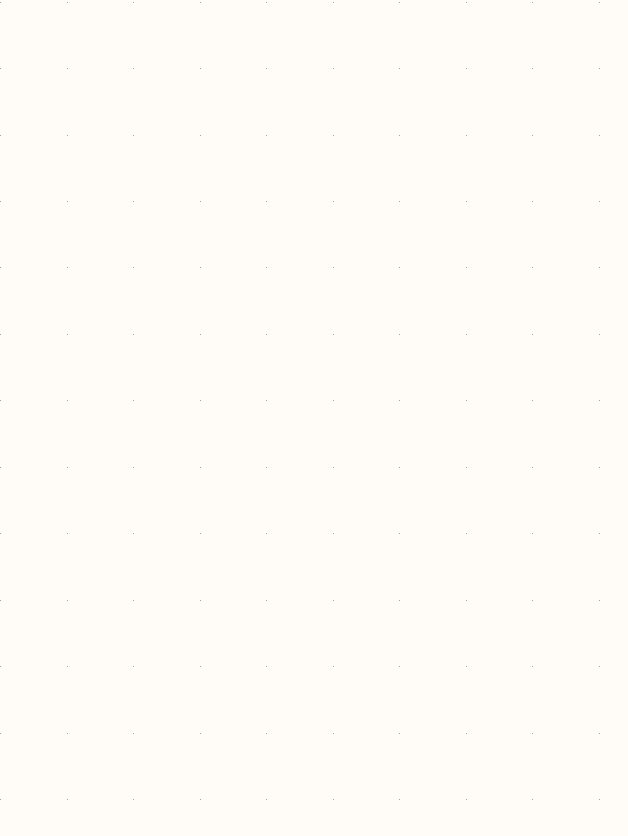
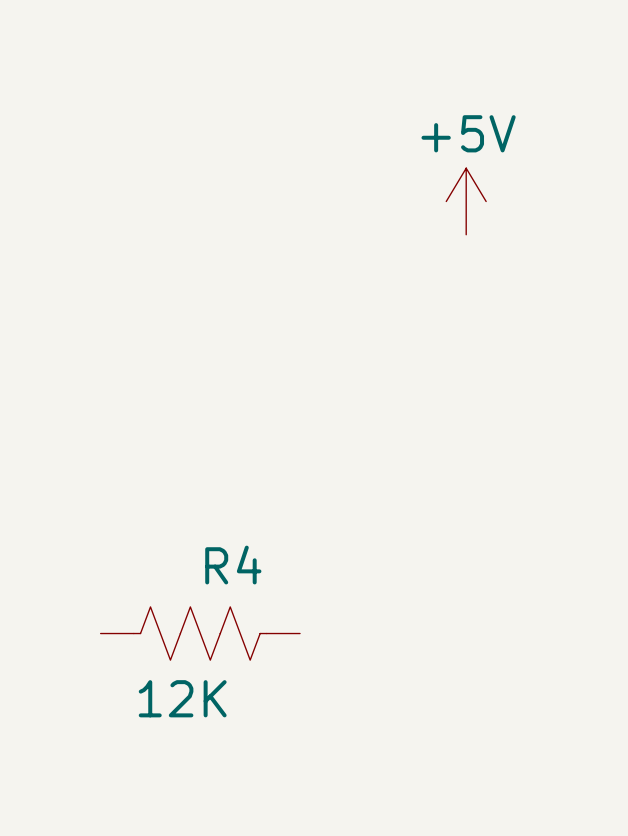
power symbol: none -> +5V (466, 201)
R4: none -> 12K (200, 633)

